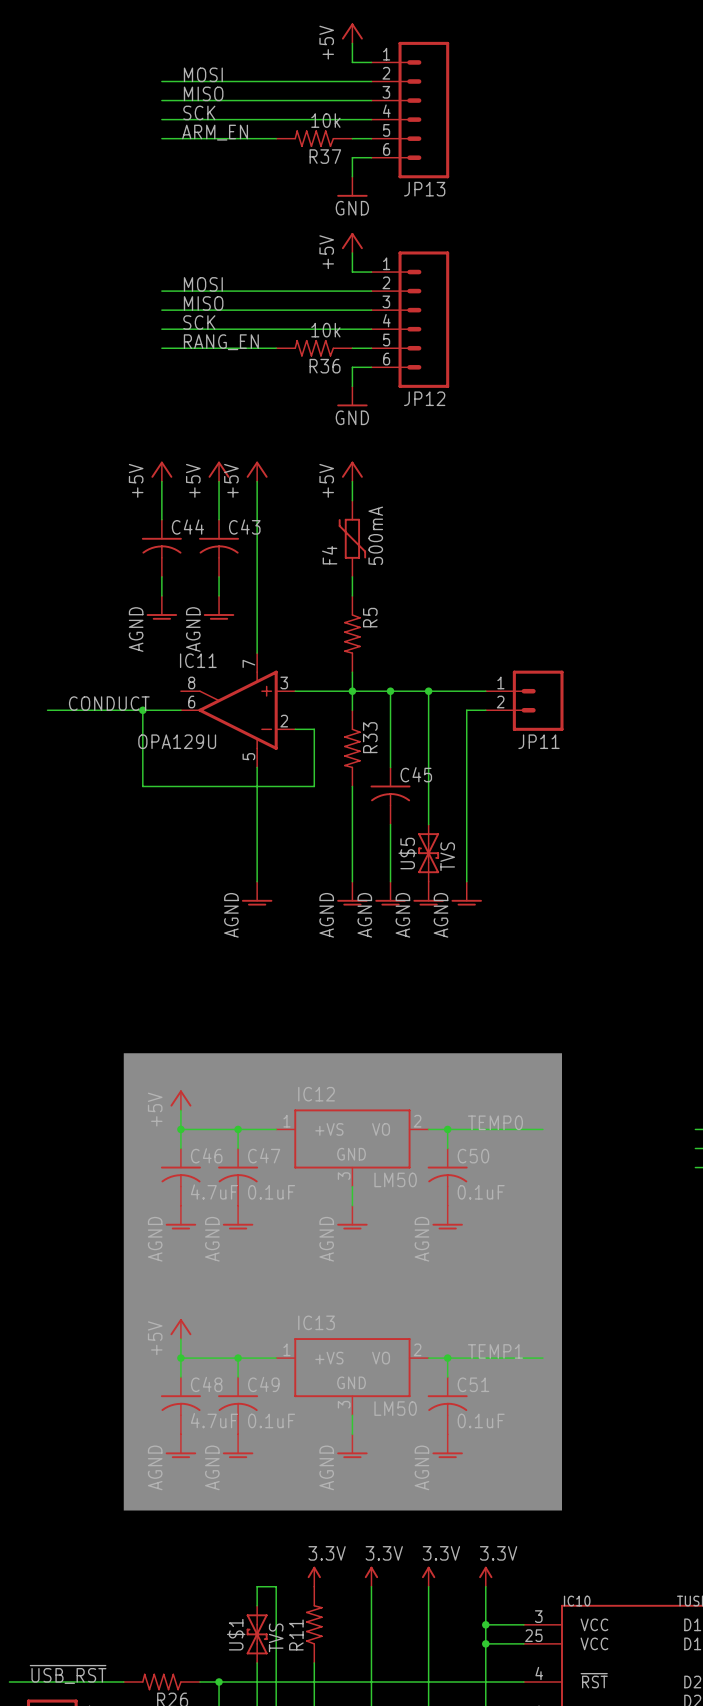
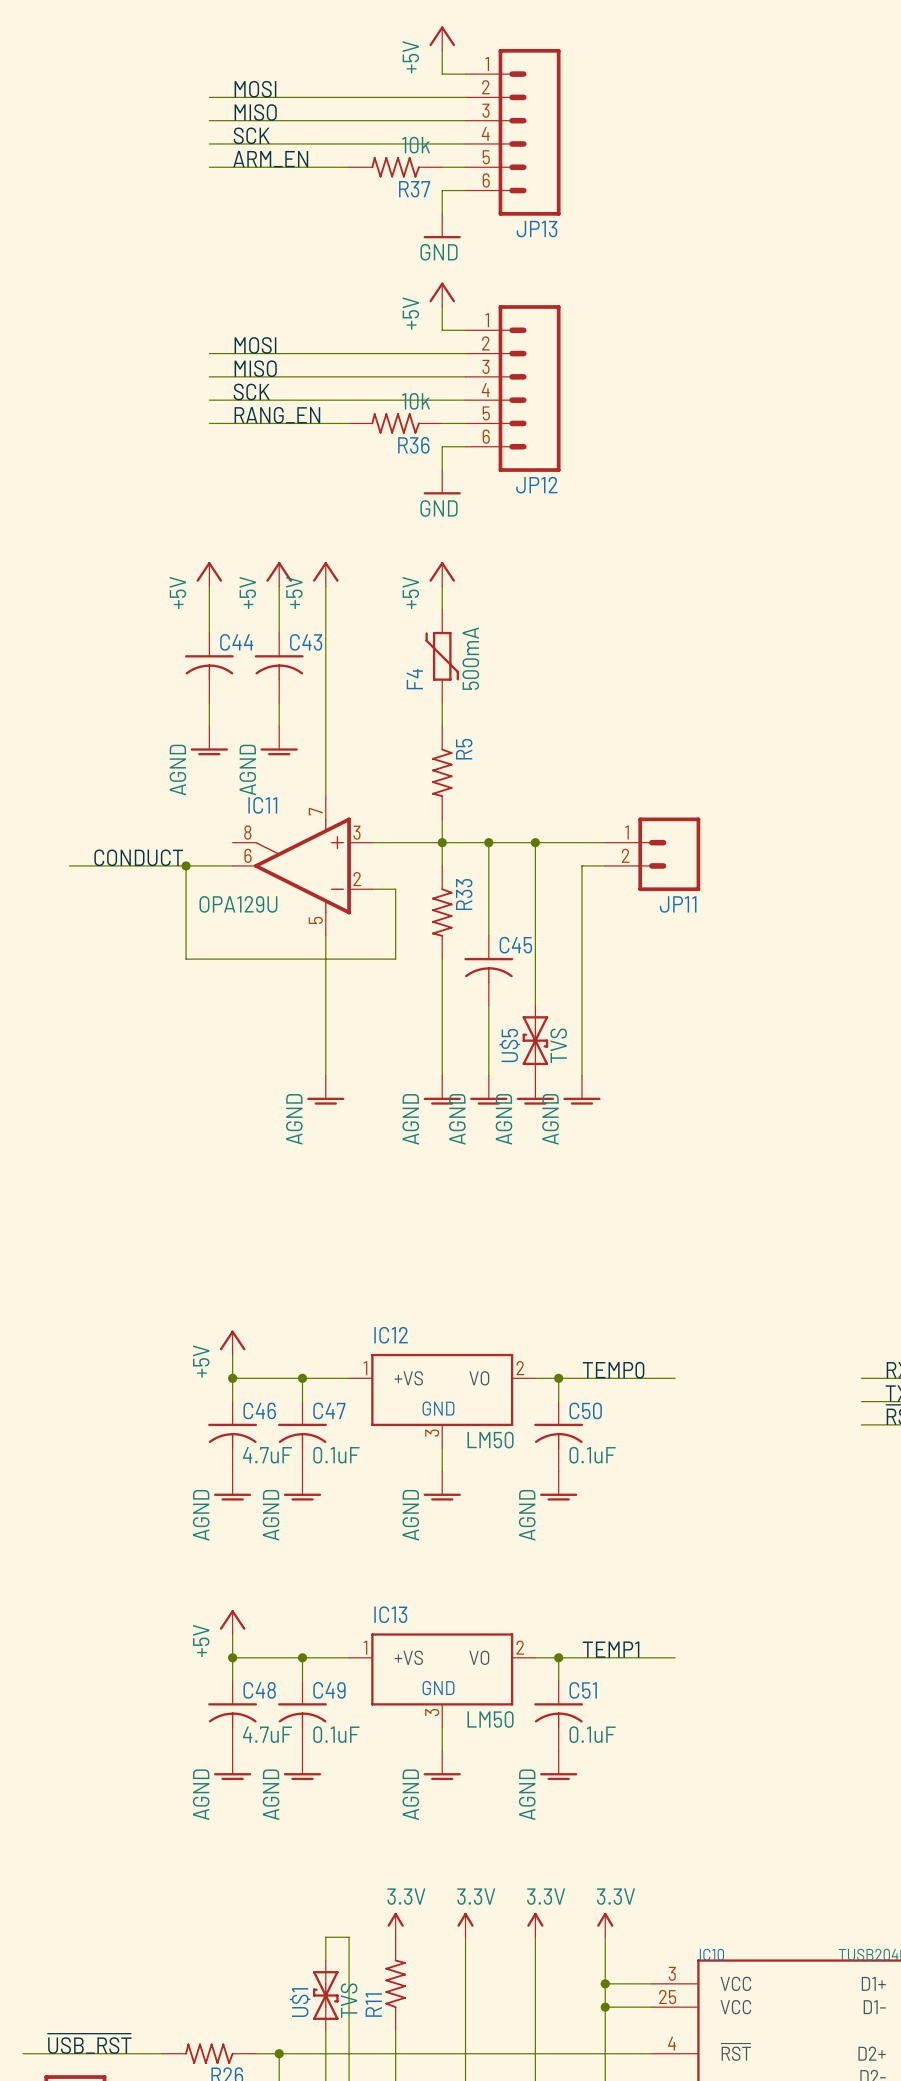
drawing: [123, 1053, 562, 1511] -> none

